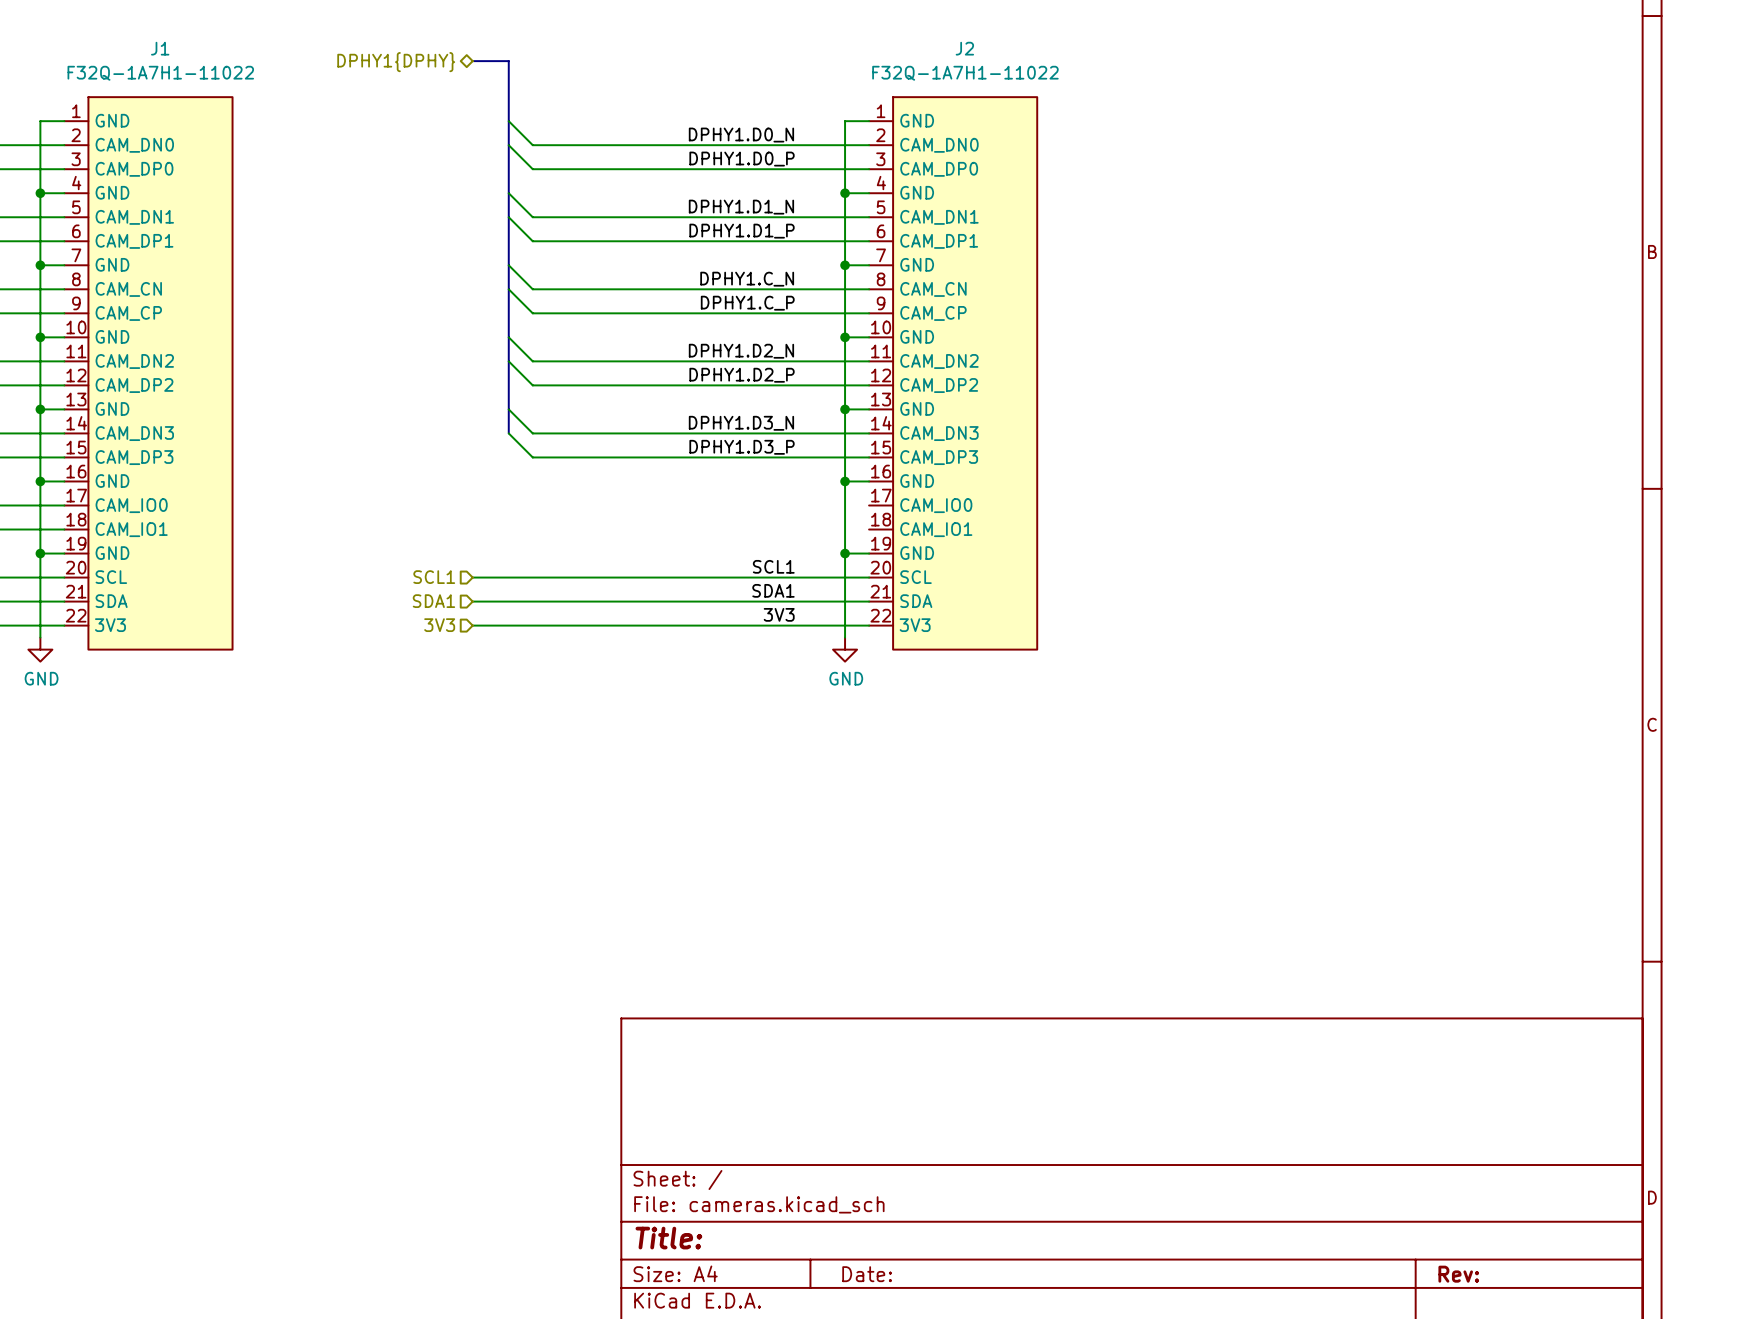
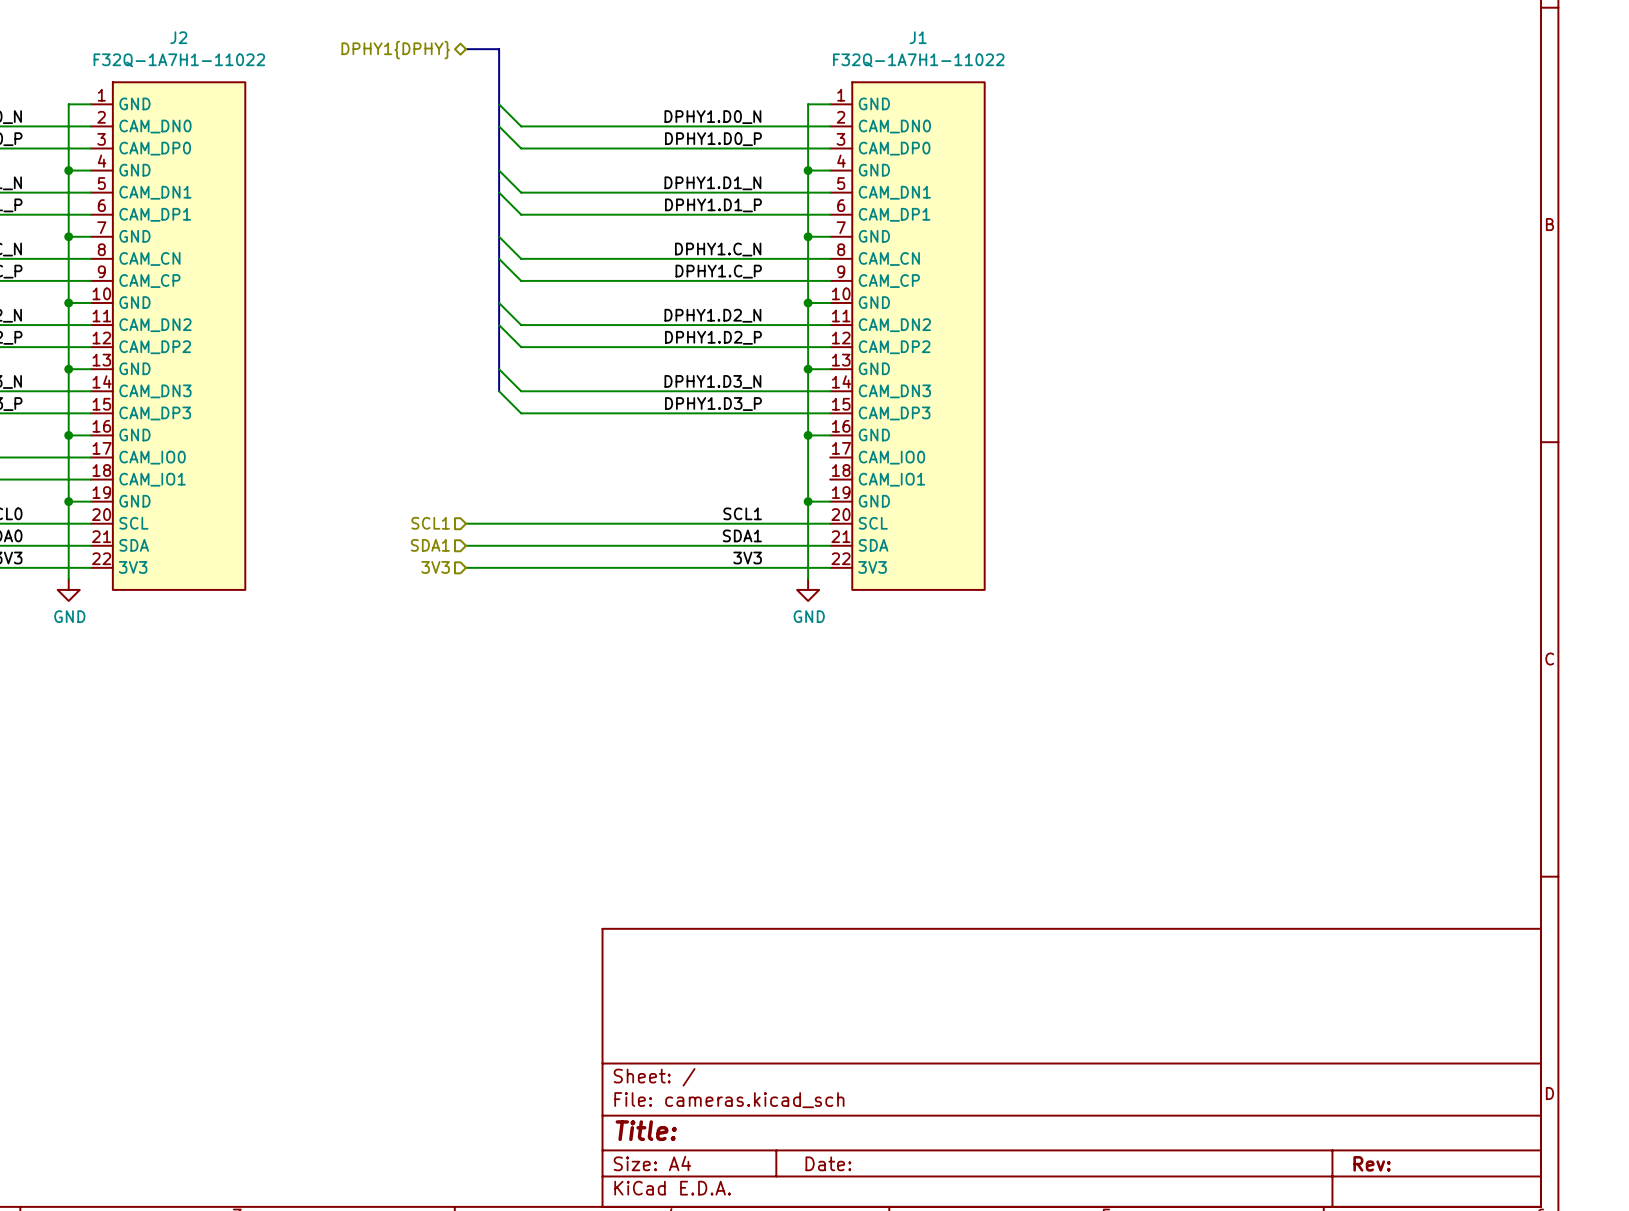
J1 name: J1 (160, 48) -> J2 (178, 37)
J2 name: J2 (964, 48) -> J1 (918, 37)

